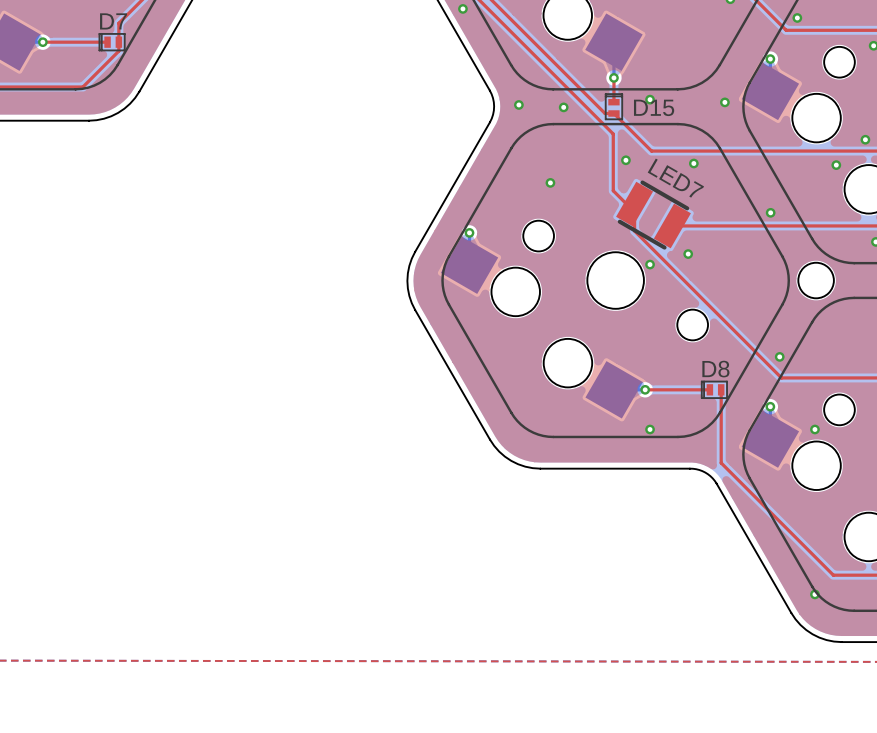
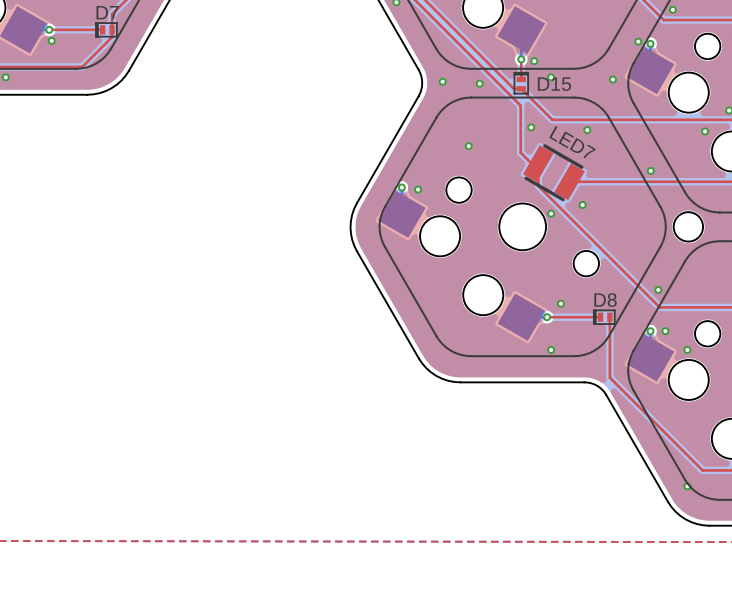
via: none -> (51, 40)
via: none -> (638, 41)
via: none -> (534, 61)
via: none -> (418, 189)
via: none -> (560, 303)
via: none -> (665, 331)

